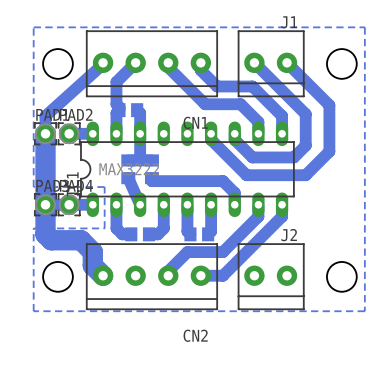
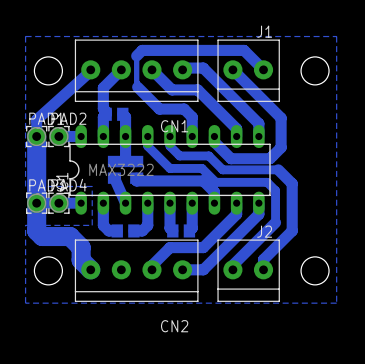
bottom track: (168, 62) (168, 67) (205, 104) (240, 104) (258, 121) (258, 125) -> (151, 69) (172, 89) (197, 89) (236, 128)
bottom track: (200, 62) (200, 70) (217, 86) (252, 86) (282, 116) (282, 120) -> (182, 69) (184, 68) (203, 68) (258, 123)
bottom track: (287, 62) (329, 105) (329, 151) (305, 175) (246, 175) (211, 139) (211, 133) -> (263, 69) (244, 50) (142, 50) (136, 55) (137, 87) (159, 109) (184, 109) (192, 117) (192, 136)
bottom track: none -> (147, 136) (147, 146) (170, 168) (201, 168) (215, 182) (267, 182) (275, 190) (275, 222) (232, 265) (232, 269)
bottom track: none -> (170, 136) (170, 146) (179, 155) (208, 155) (222, 169) (278, 169) (292, 183) (292, 230) (263, 259) (263, 269)

